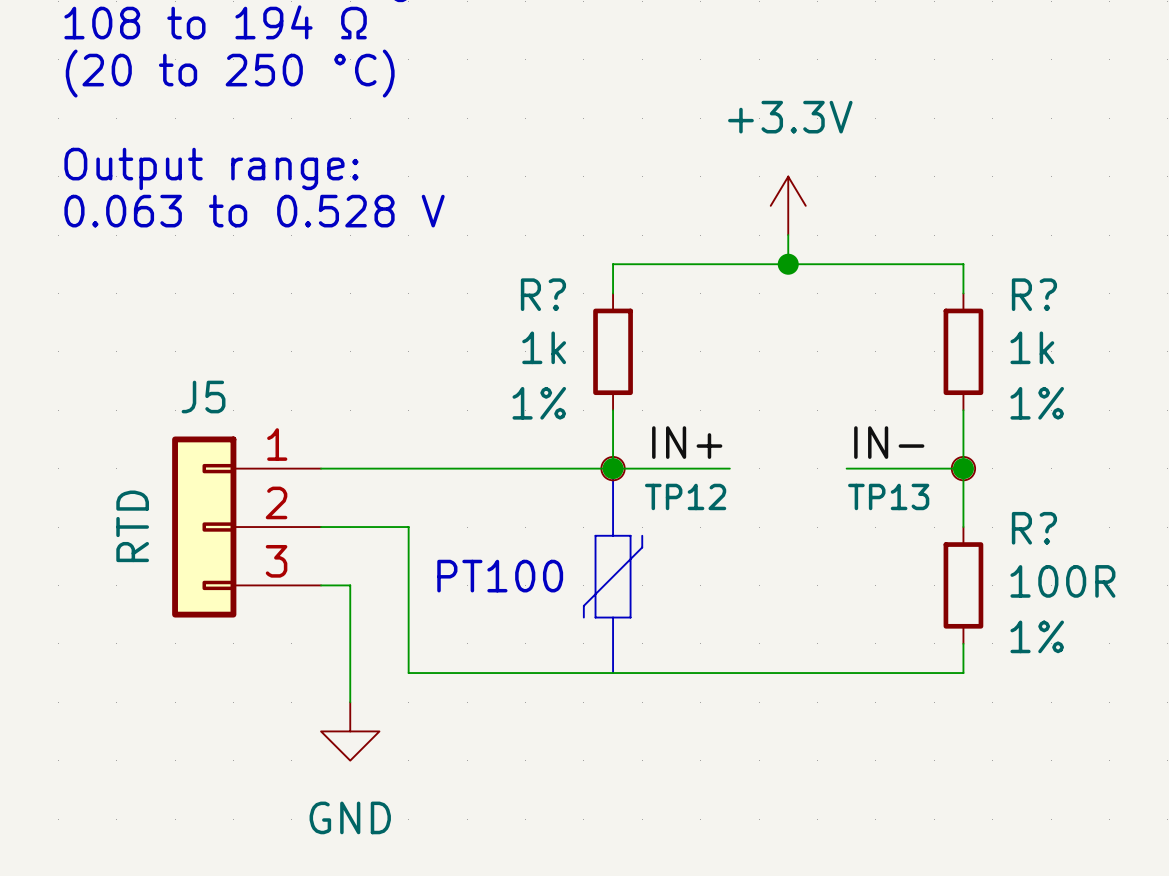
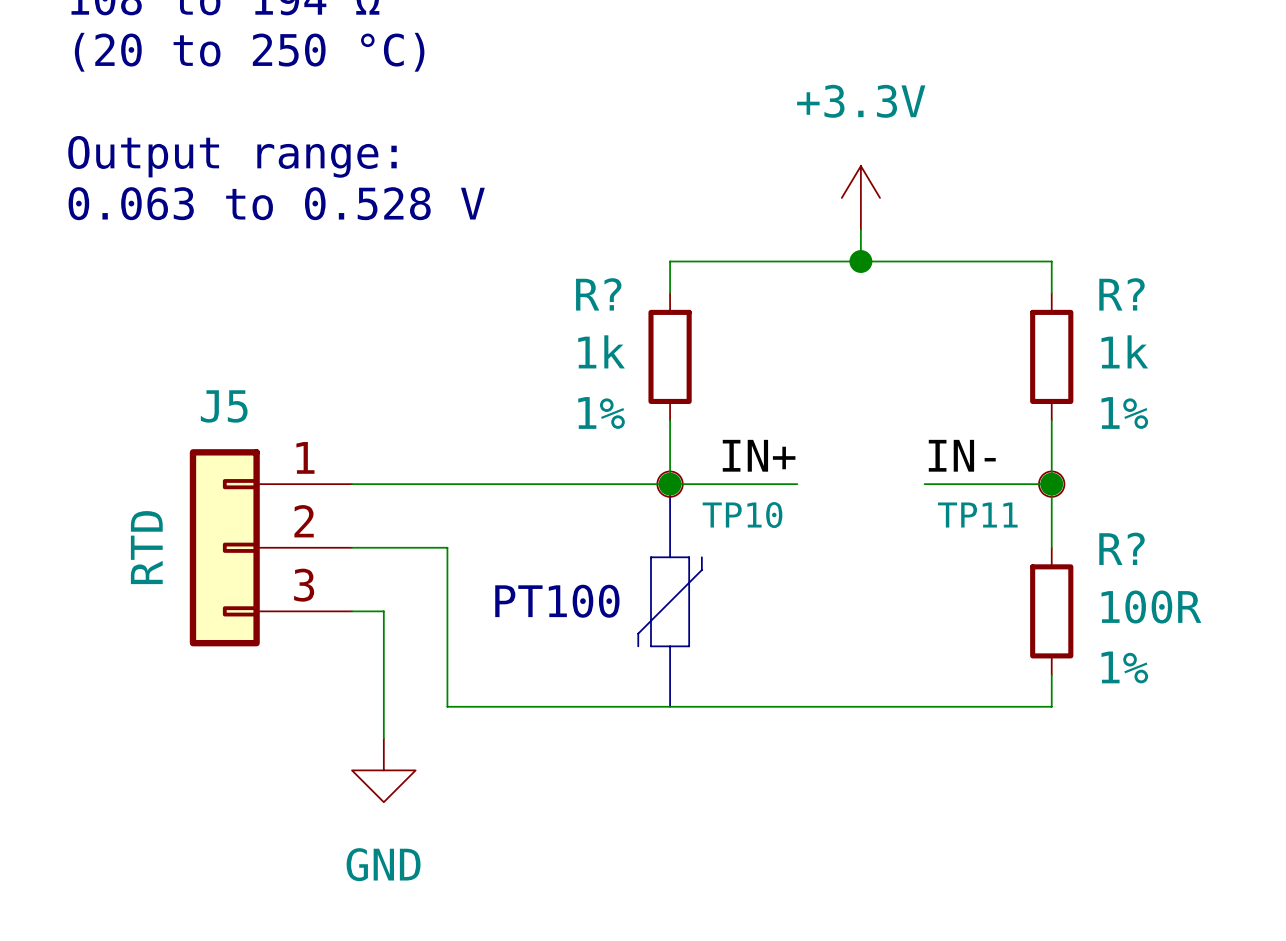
TP12 name: TP12 (685, 496) -> TP10 (742, 515)
TP13 name: TP13 (888, 496) -> TP11 (977, 515)

